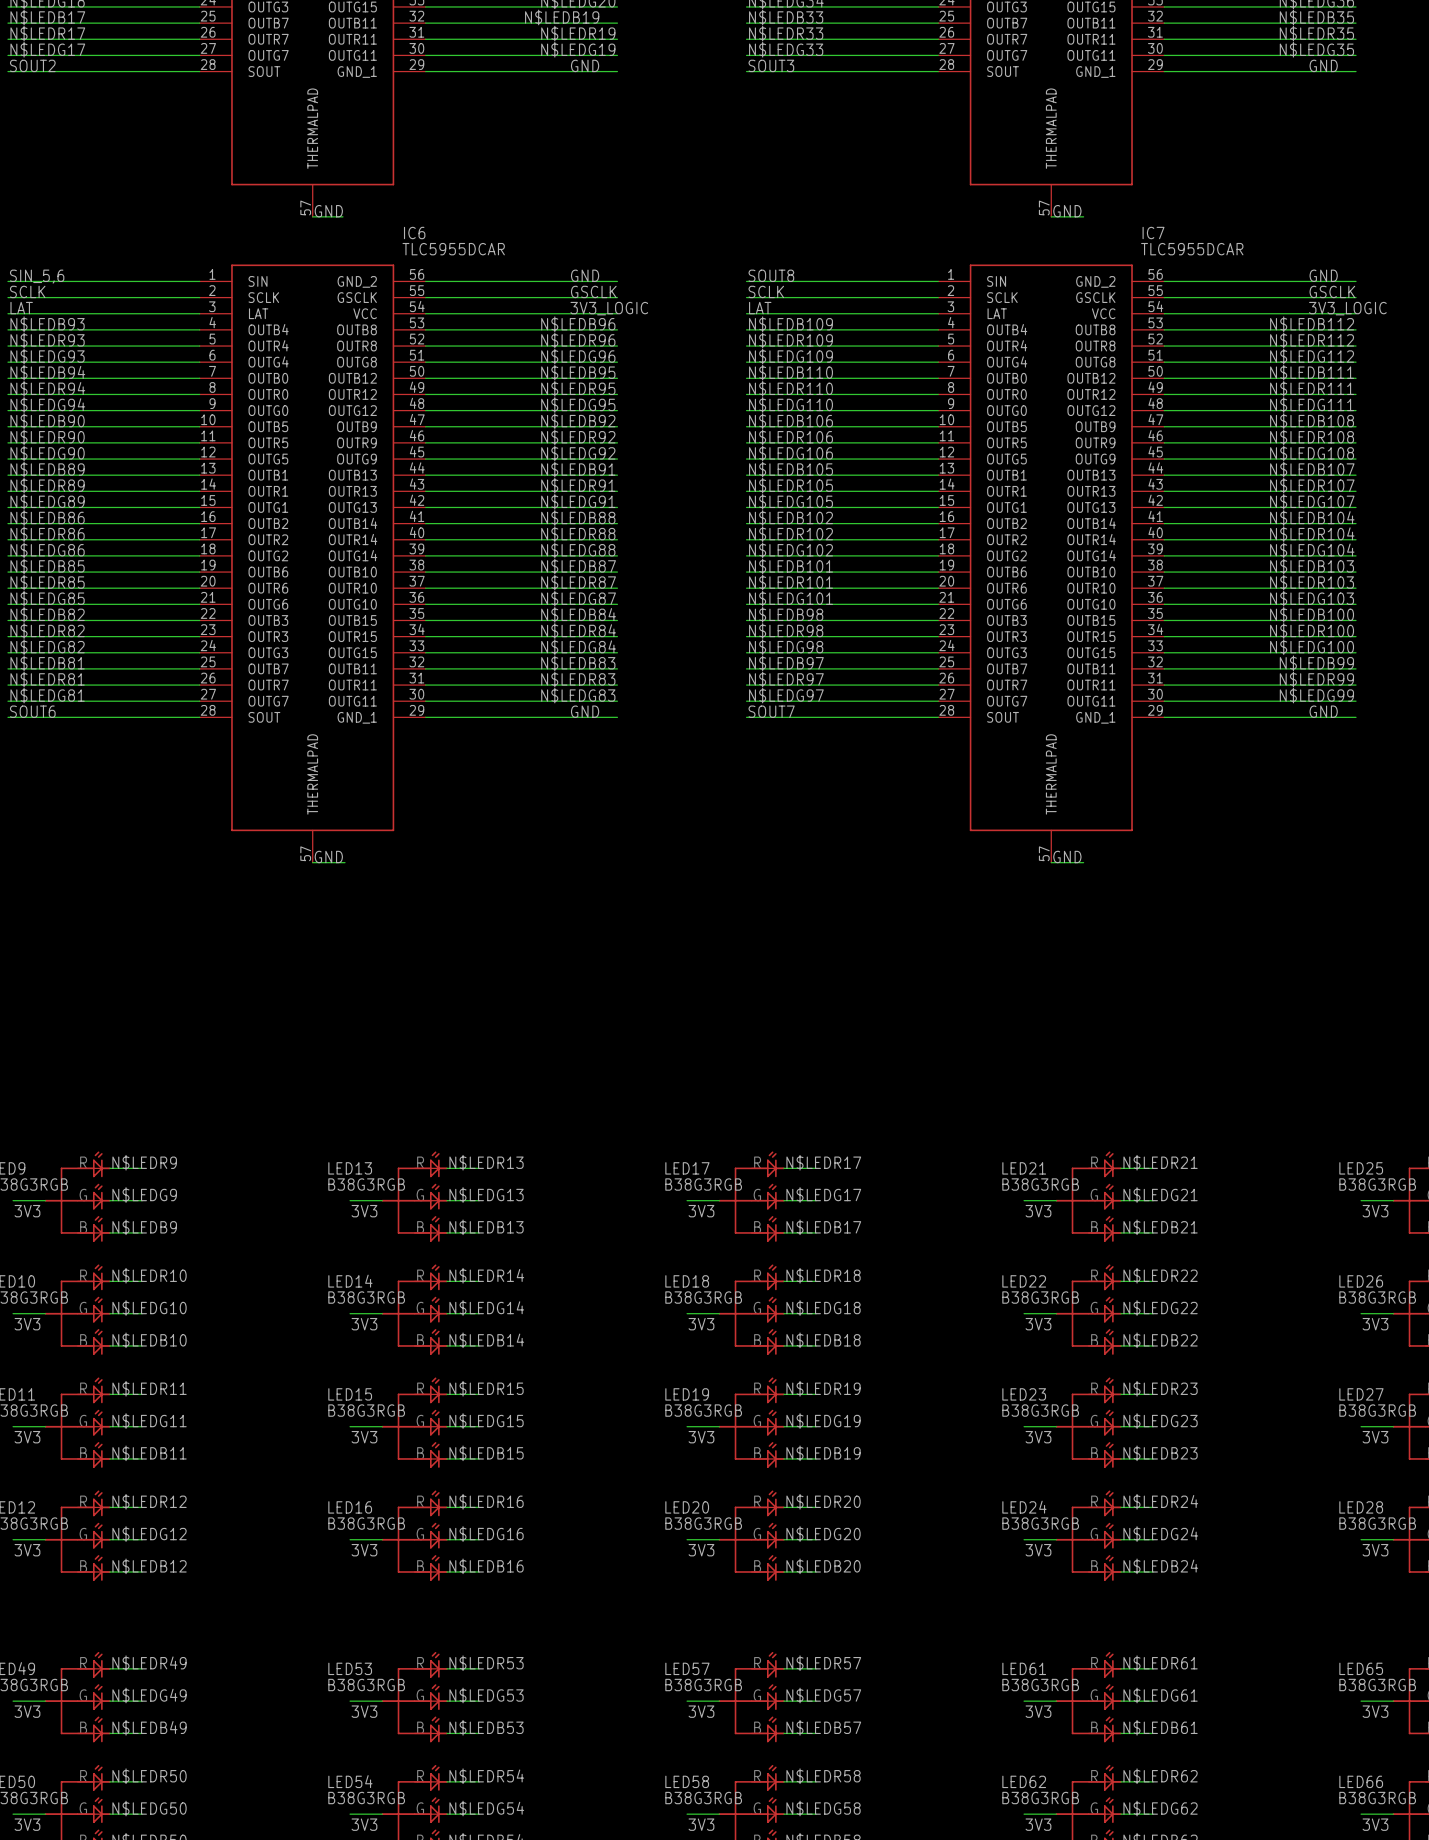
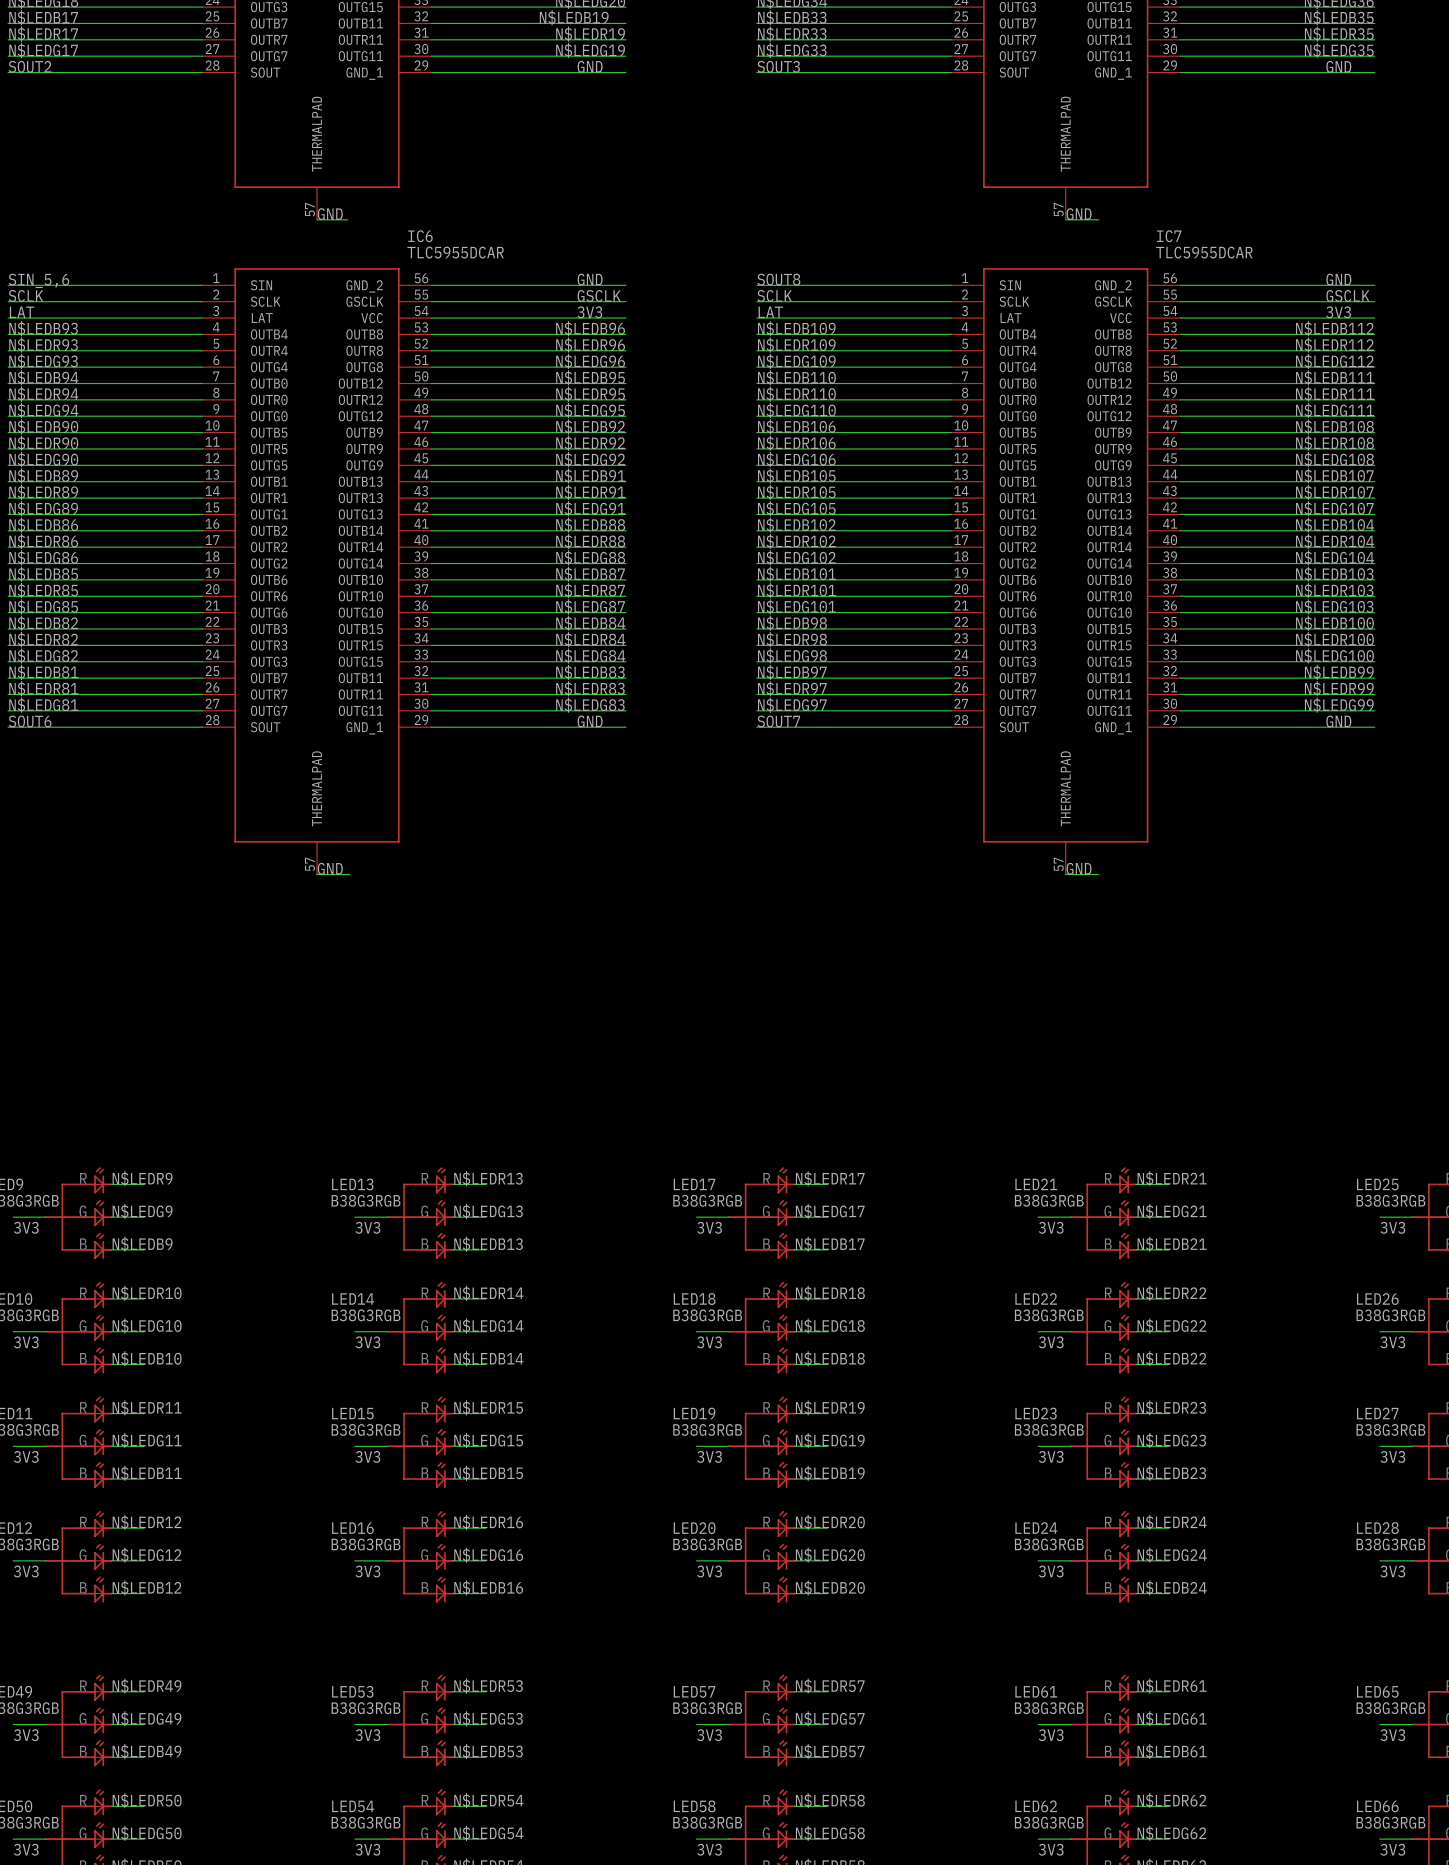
label: 3V3_LOGIC (609, 308) -> 3V3 (589, 312)
label: 3V3_LOGIC (1347, 308) -> 3V3 (1338, 312)

